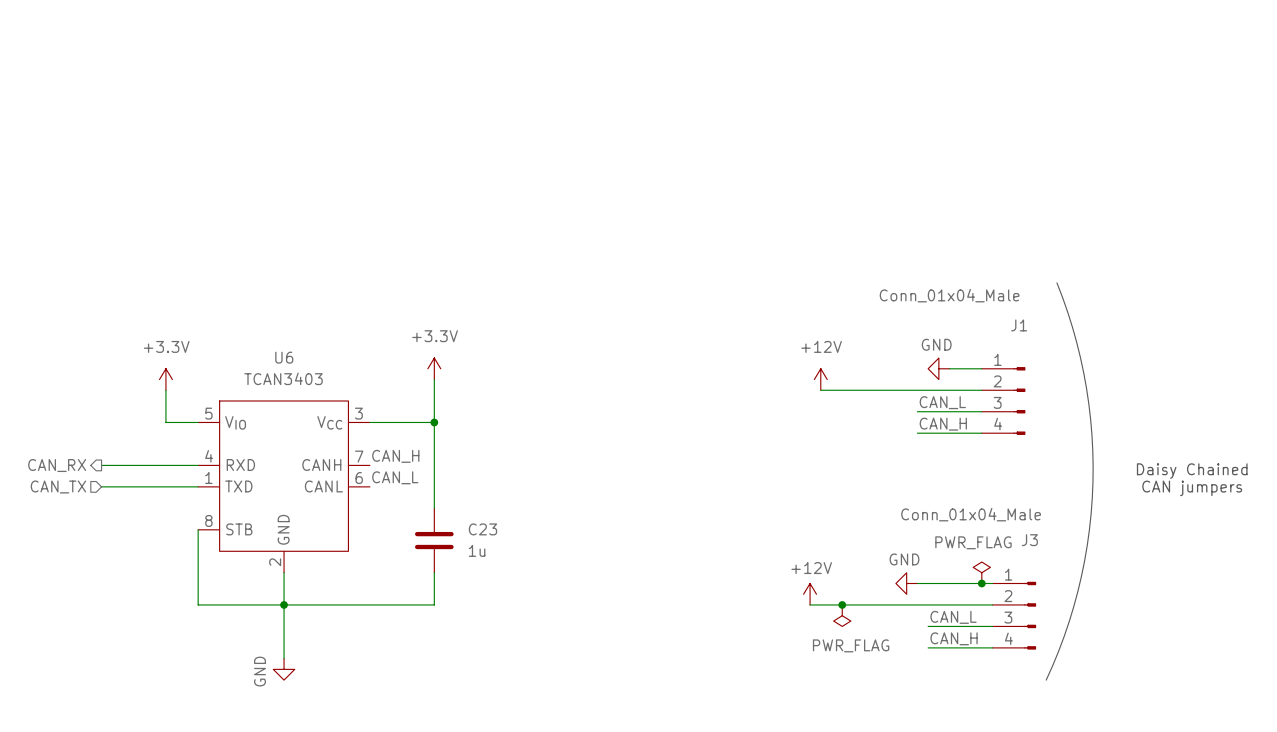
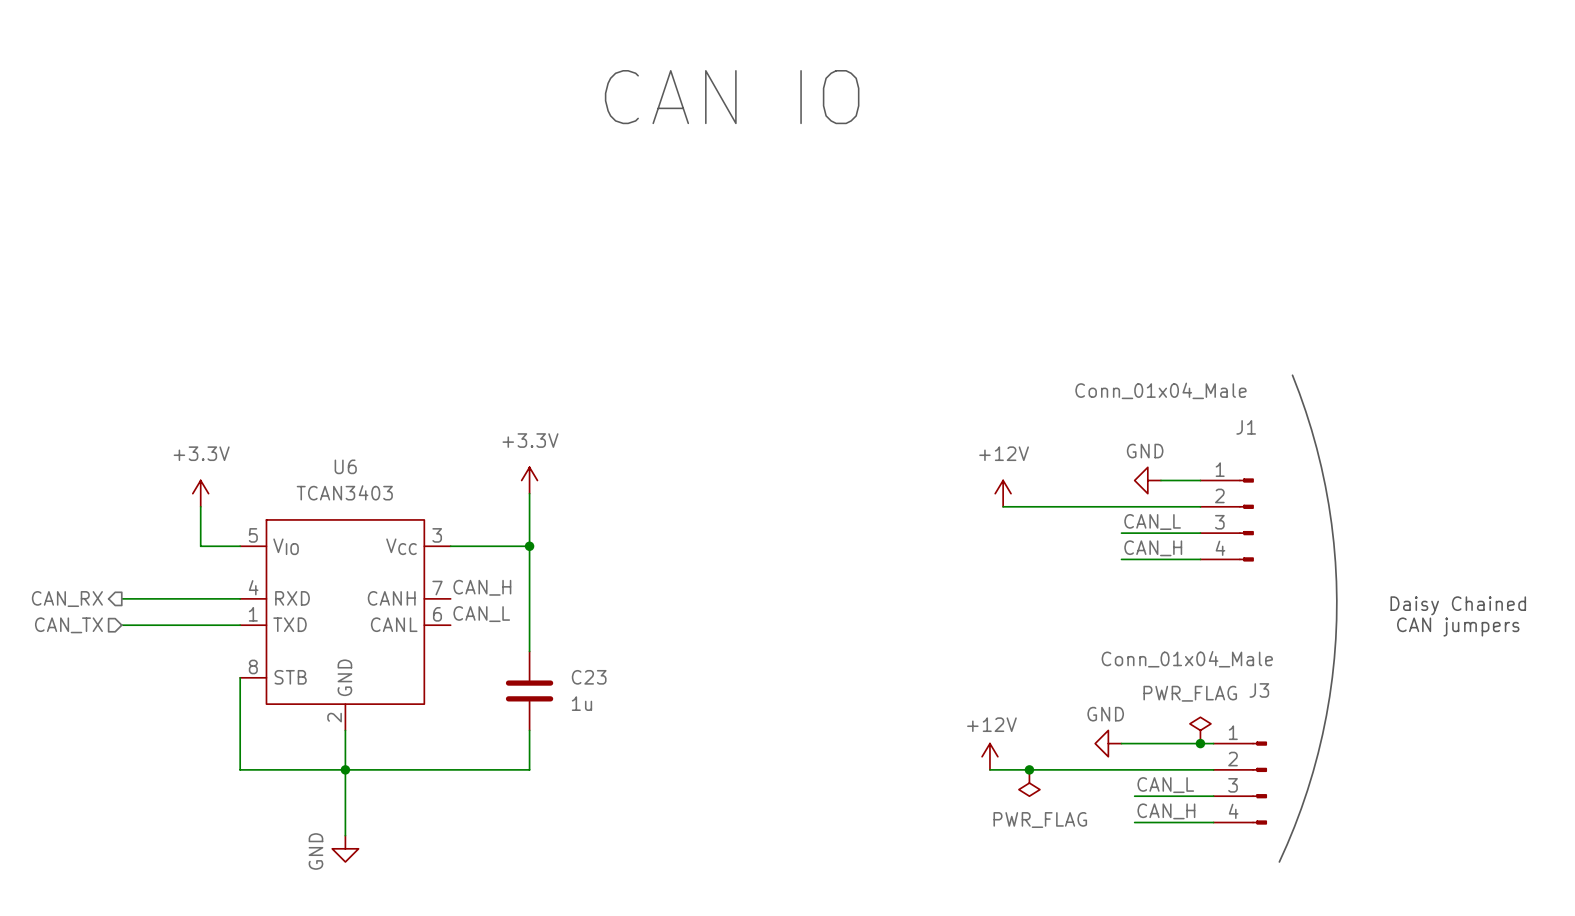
text: none -> CAN IO (732, 97)

